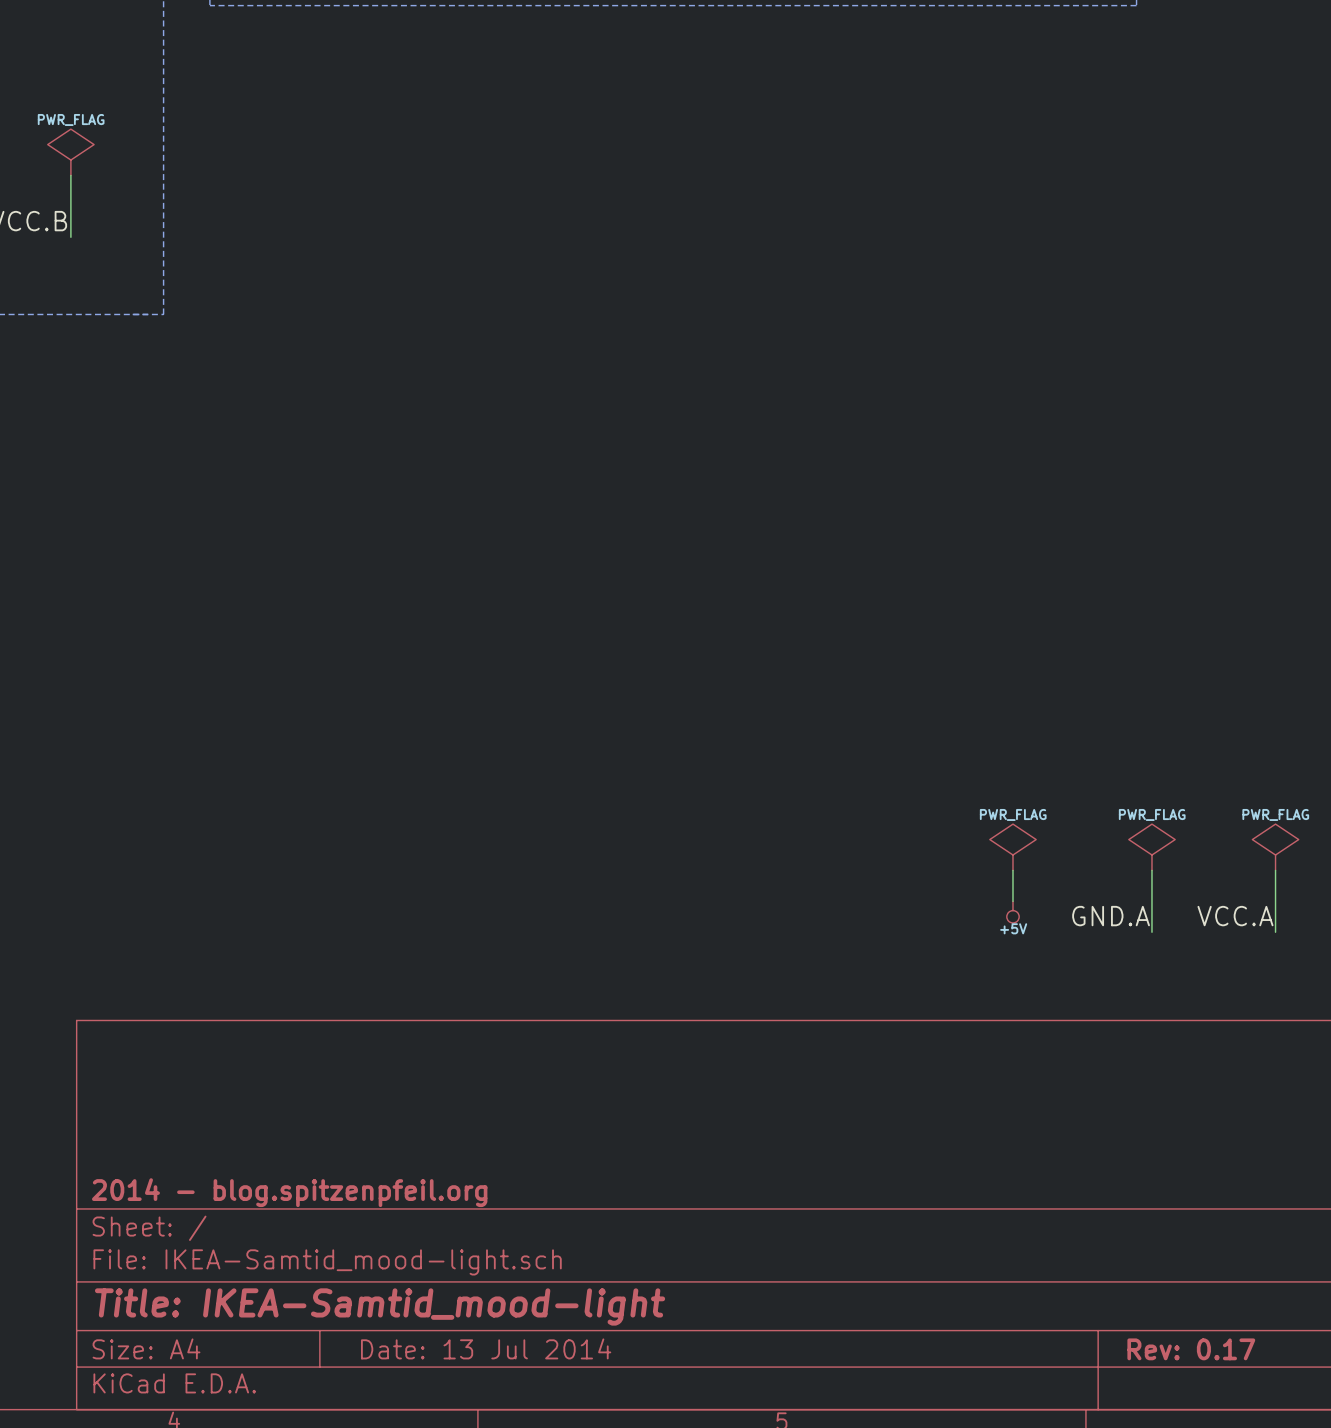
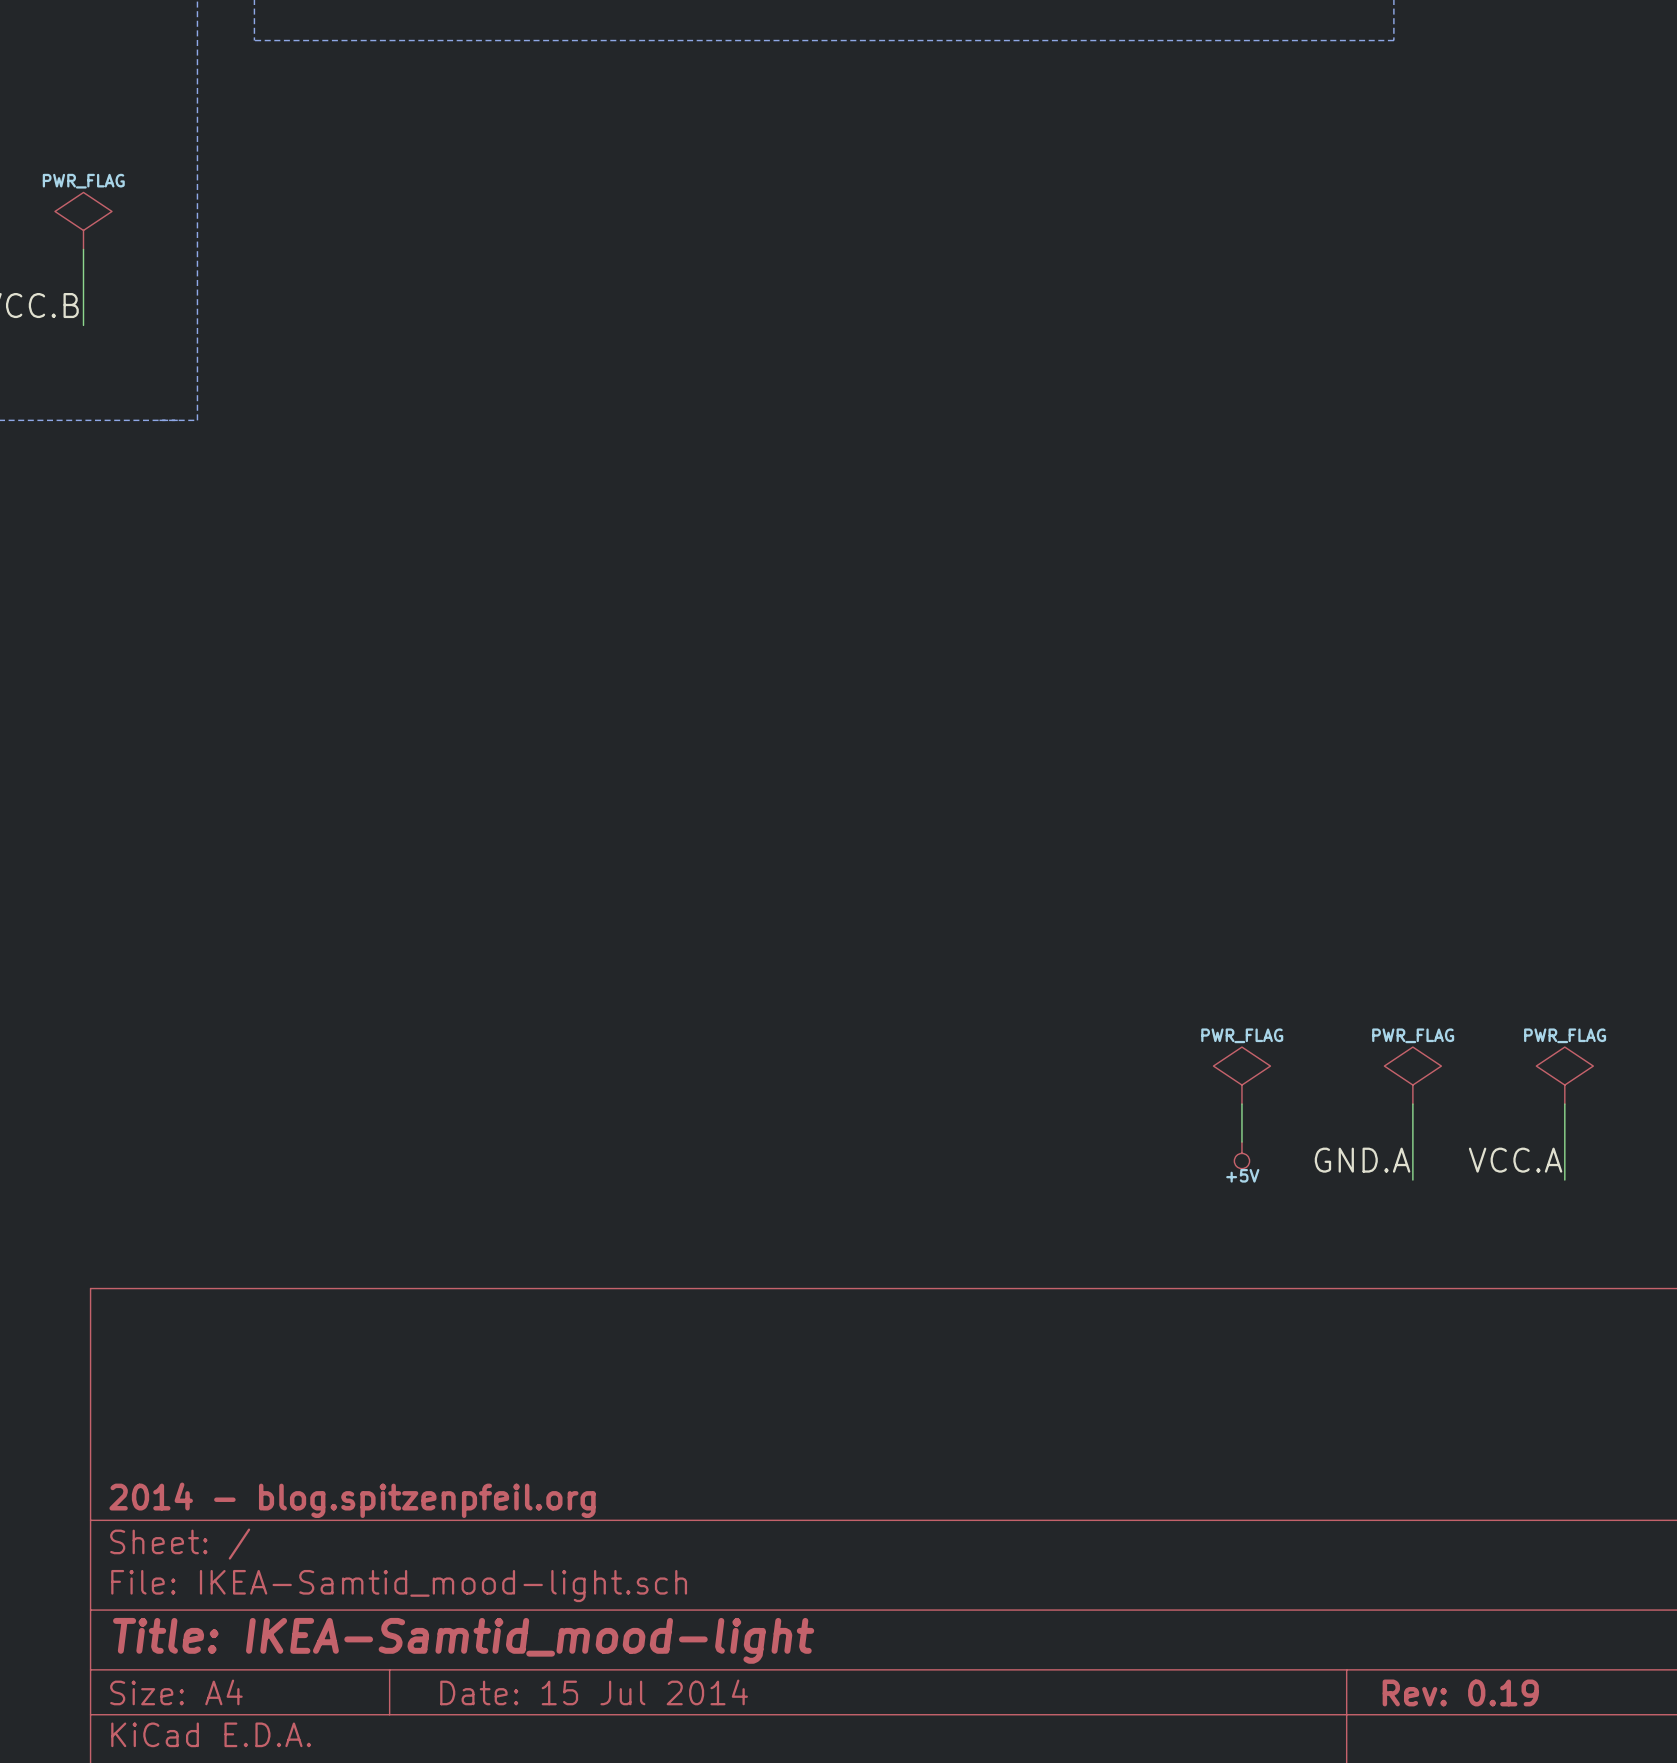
title block: Date: 13 Jul 2014 (486, 1348) -> Date: 15 Jul 2014 (594, 1692)
title block: Rev: 0.17 (1191, 1349) -> Rev: 0.19 (1460, 1692)

